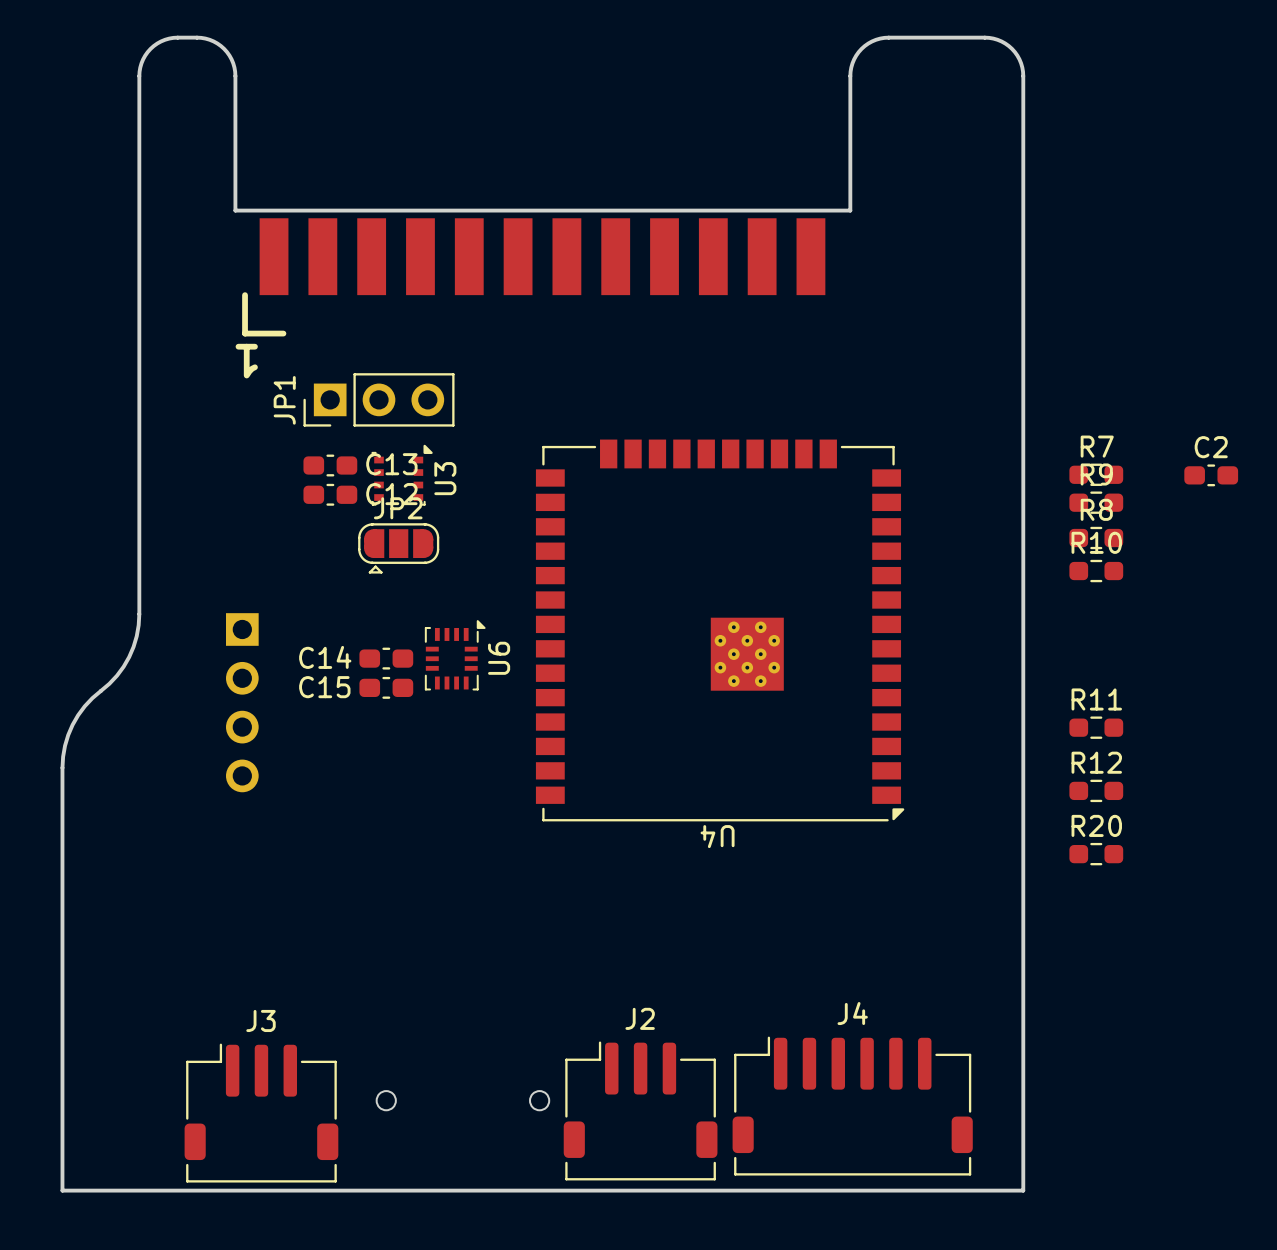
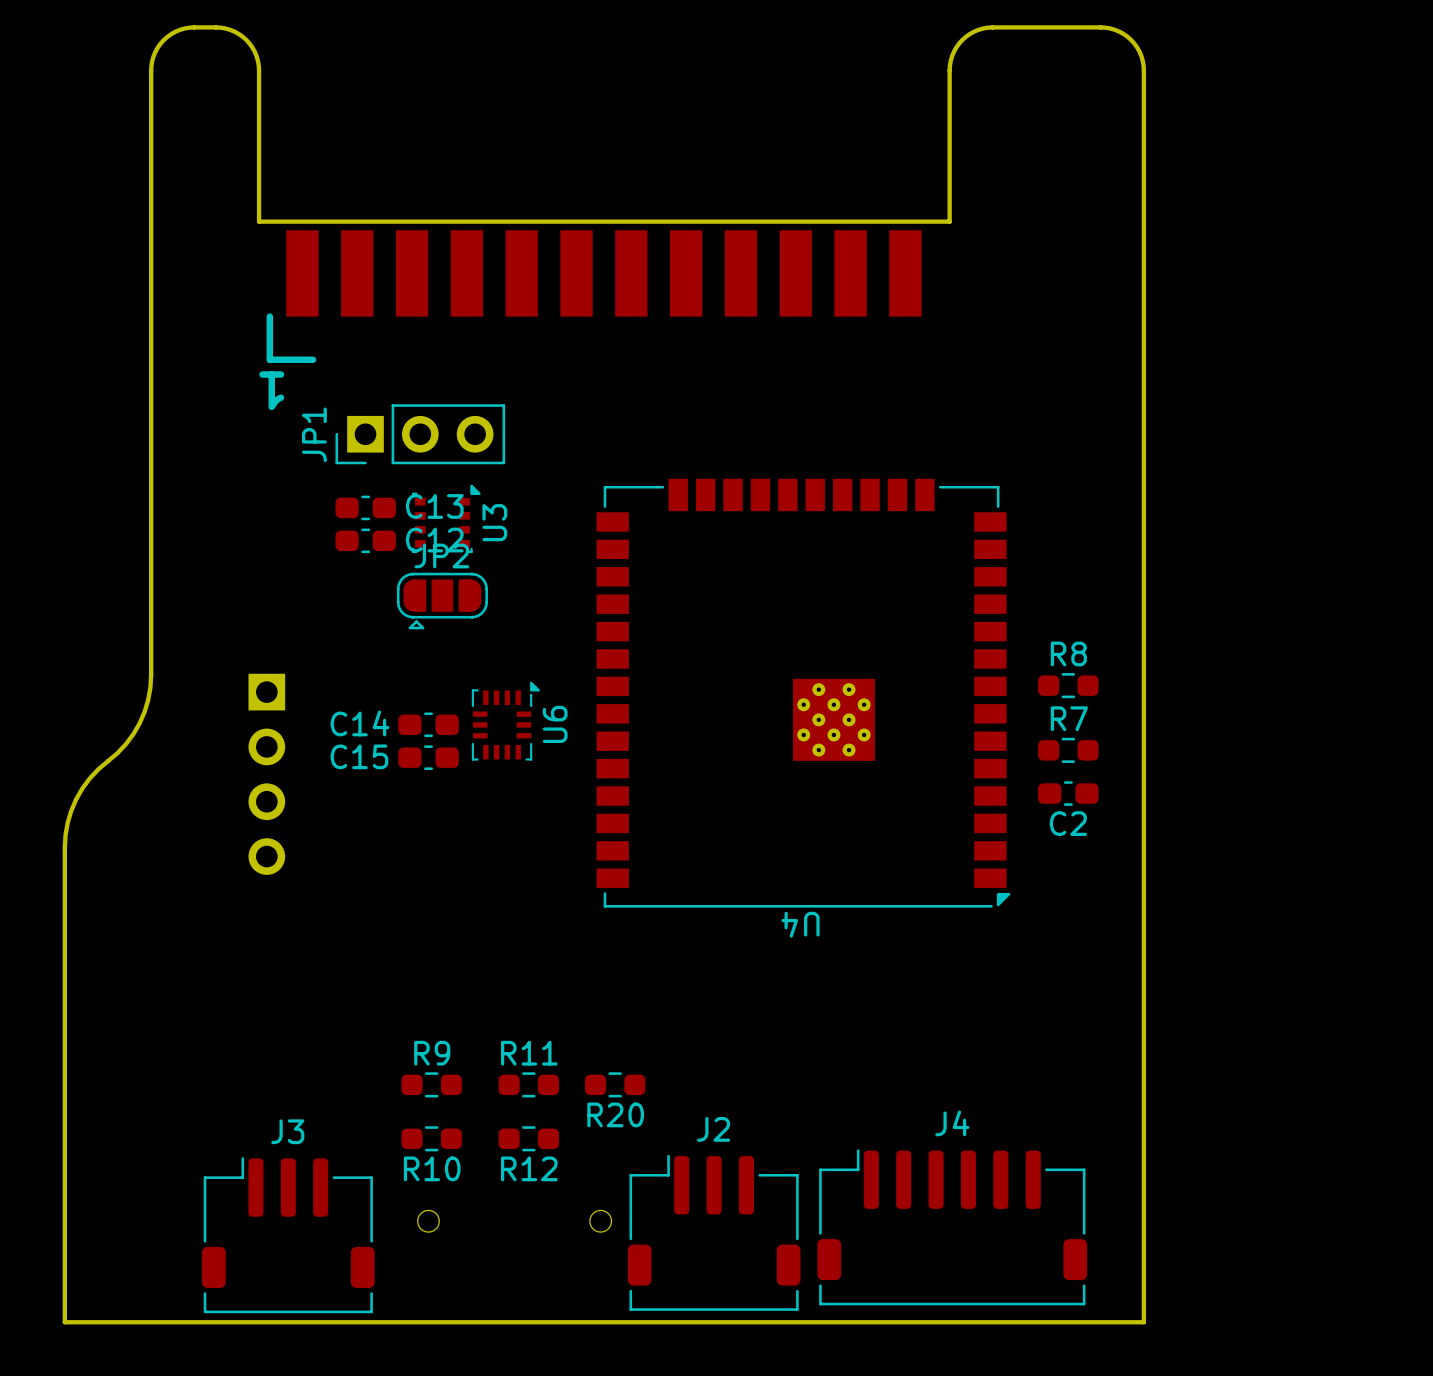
C2 name position: C2 (1211, 447) -> C2 (1068, 823)
R7 position: (1096, 474) -> (1068, 750)
C2 position: (1211, 475) -> (1068, 793)
R9 position: (1096, 502) -> (431, 1084)
R8 position: (1096, 538) -> (1068, 685)
R10 name position: R10 (1096, 542) -> R10 (432, 1168)
R10 position: (1096, 571) -> (431, 1138)
R11 position: (1096, 727) -> (528, 1084)
R12 name position: R12 (1096, 762) -> R12 (529, 1168)
R12 position: (1096, 790) -> (528, 1138)
R20 name position: R20 (1096, 825) -> R20 (615, 1114)
R20 position: (1096, 854) -> (615, 1084)

